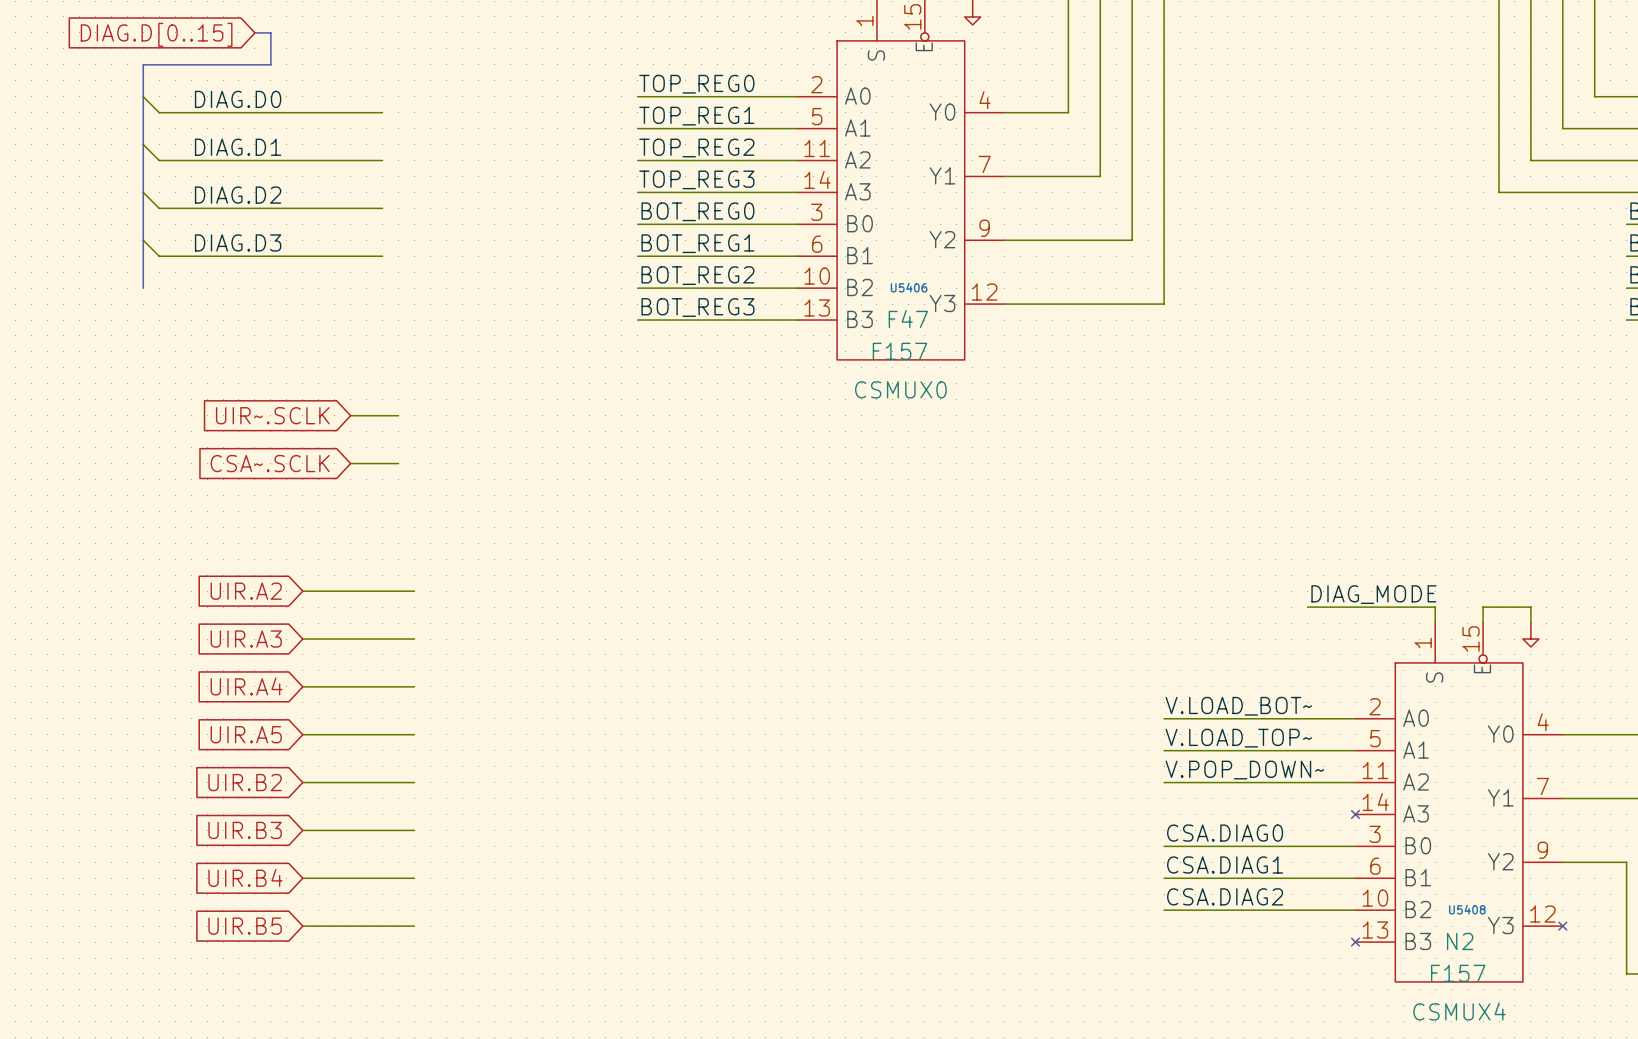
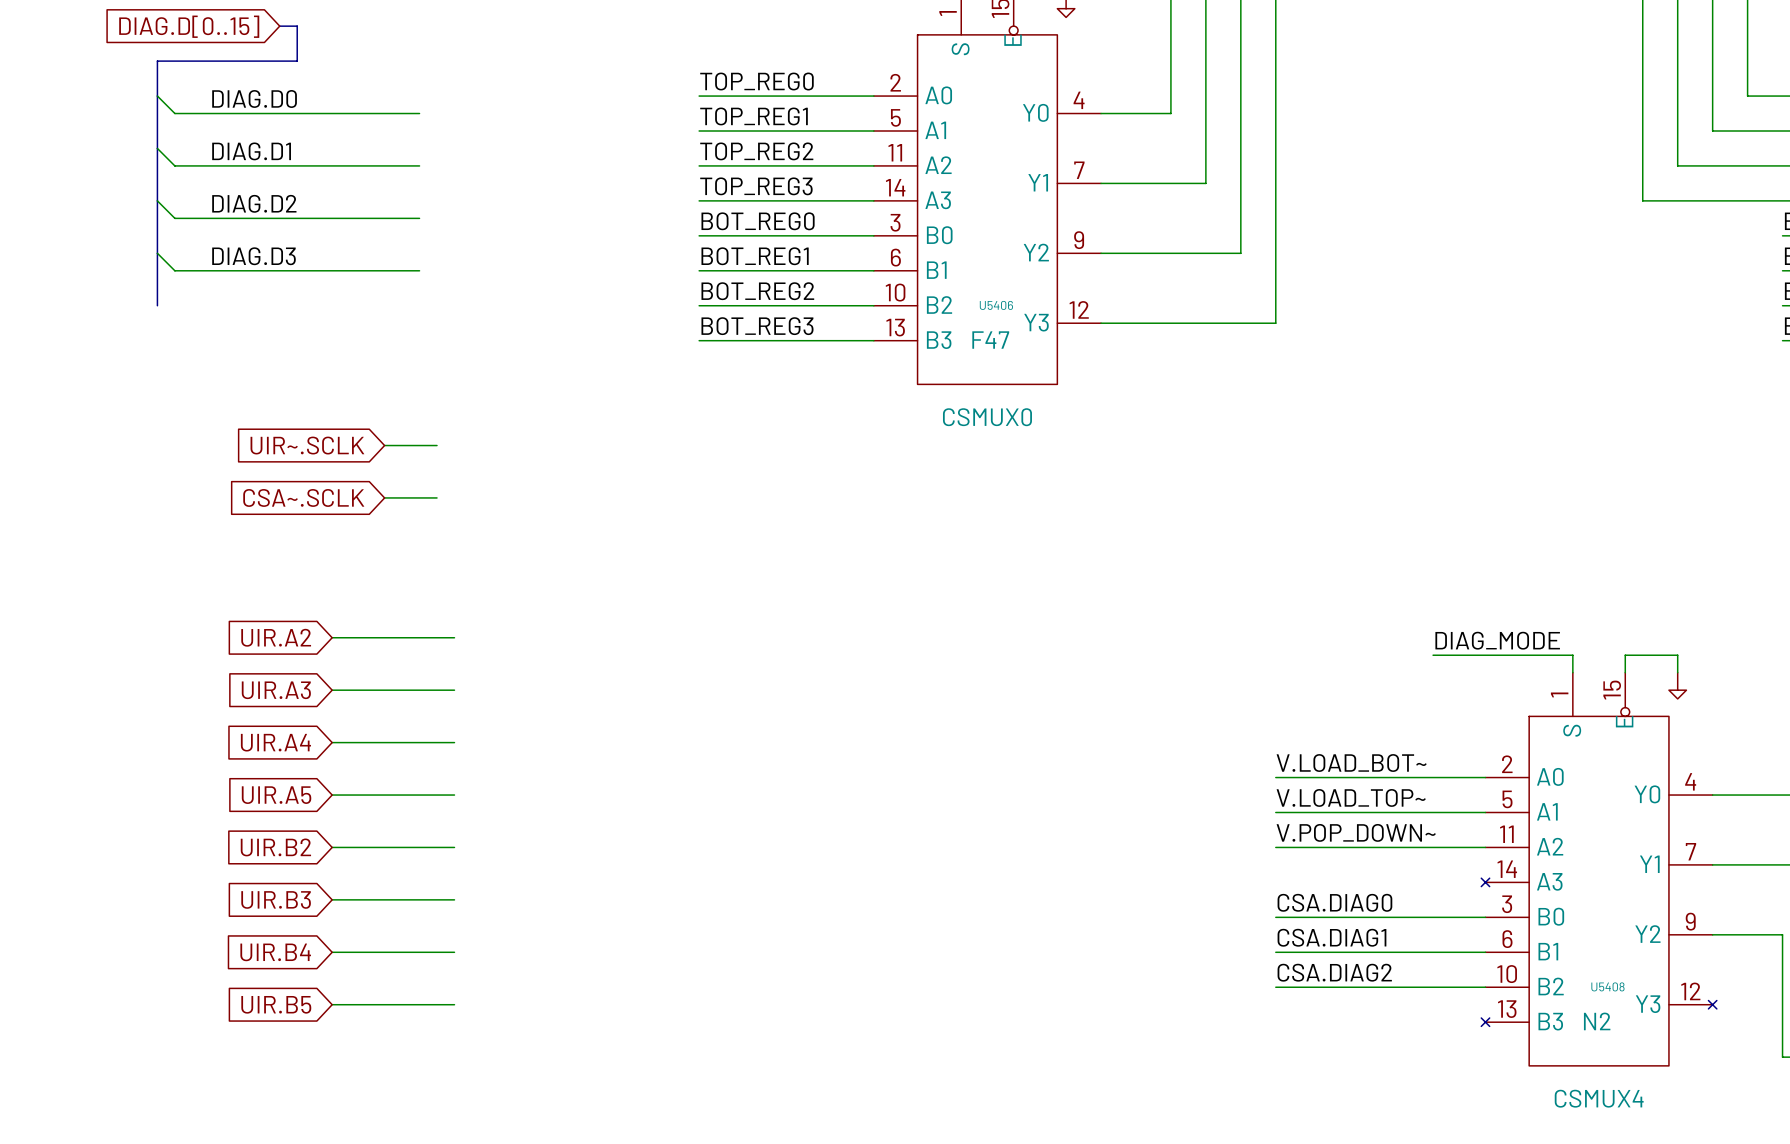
U5406 value: F157 (900, 351) -> none
U5408 value: F157 (1458, 973) -> none

